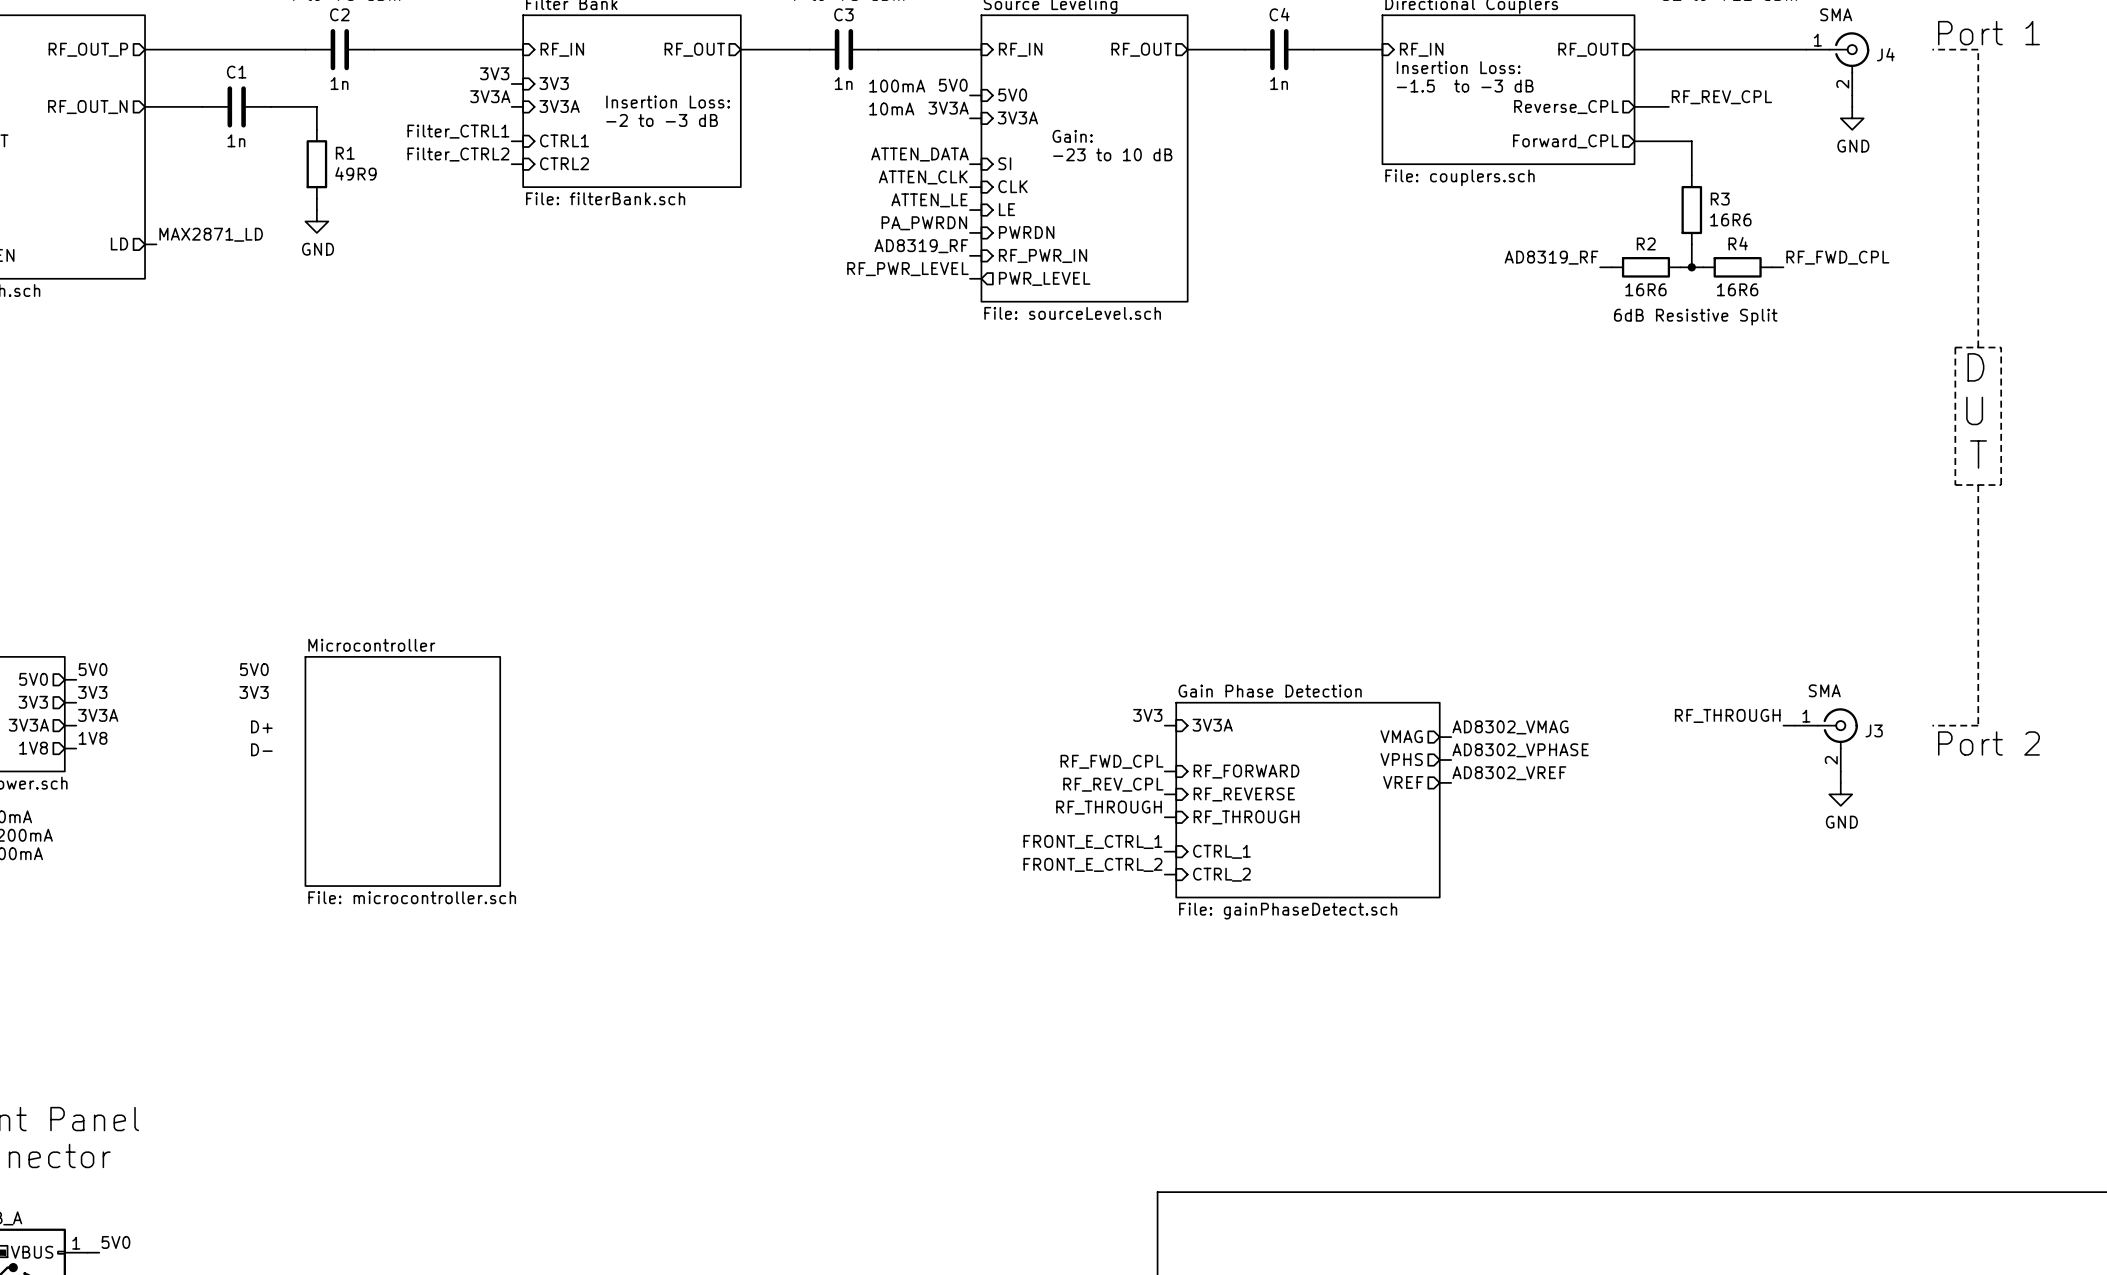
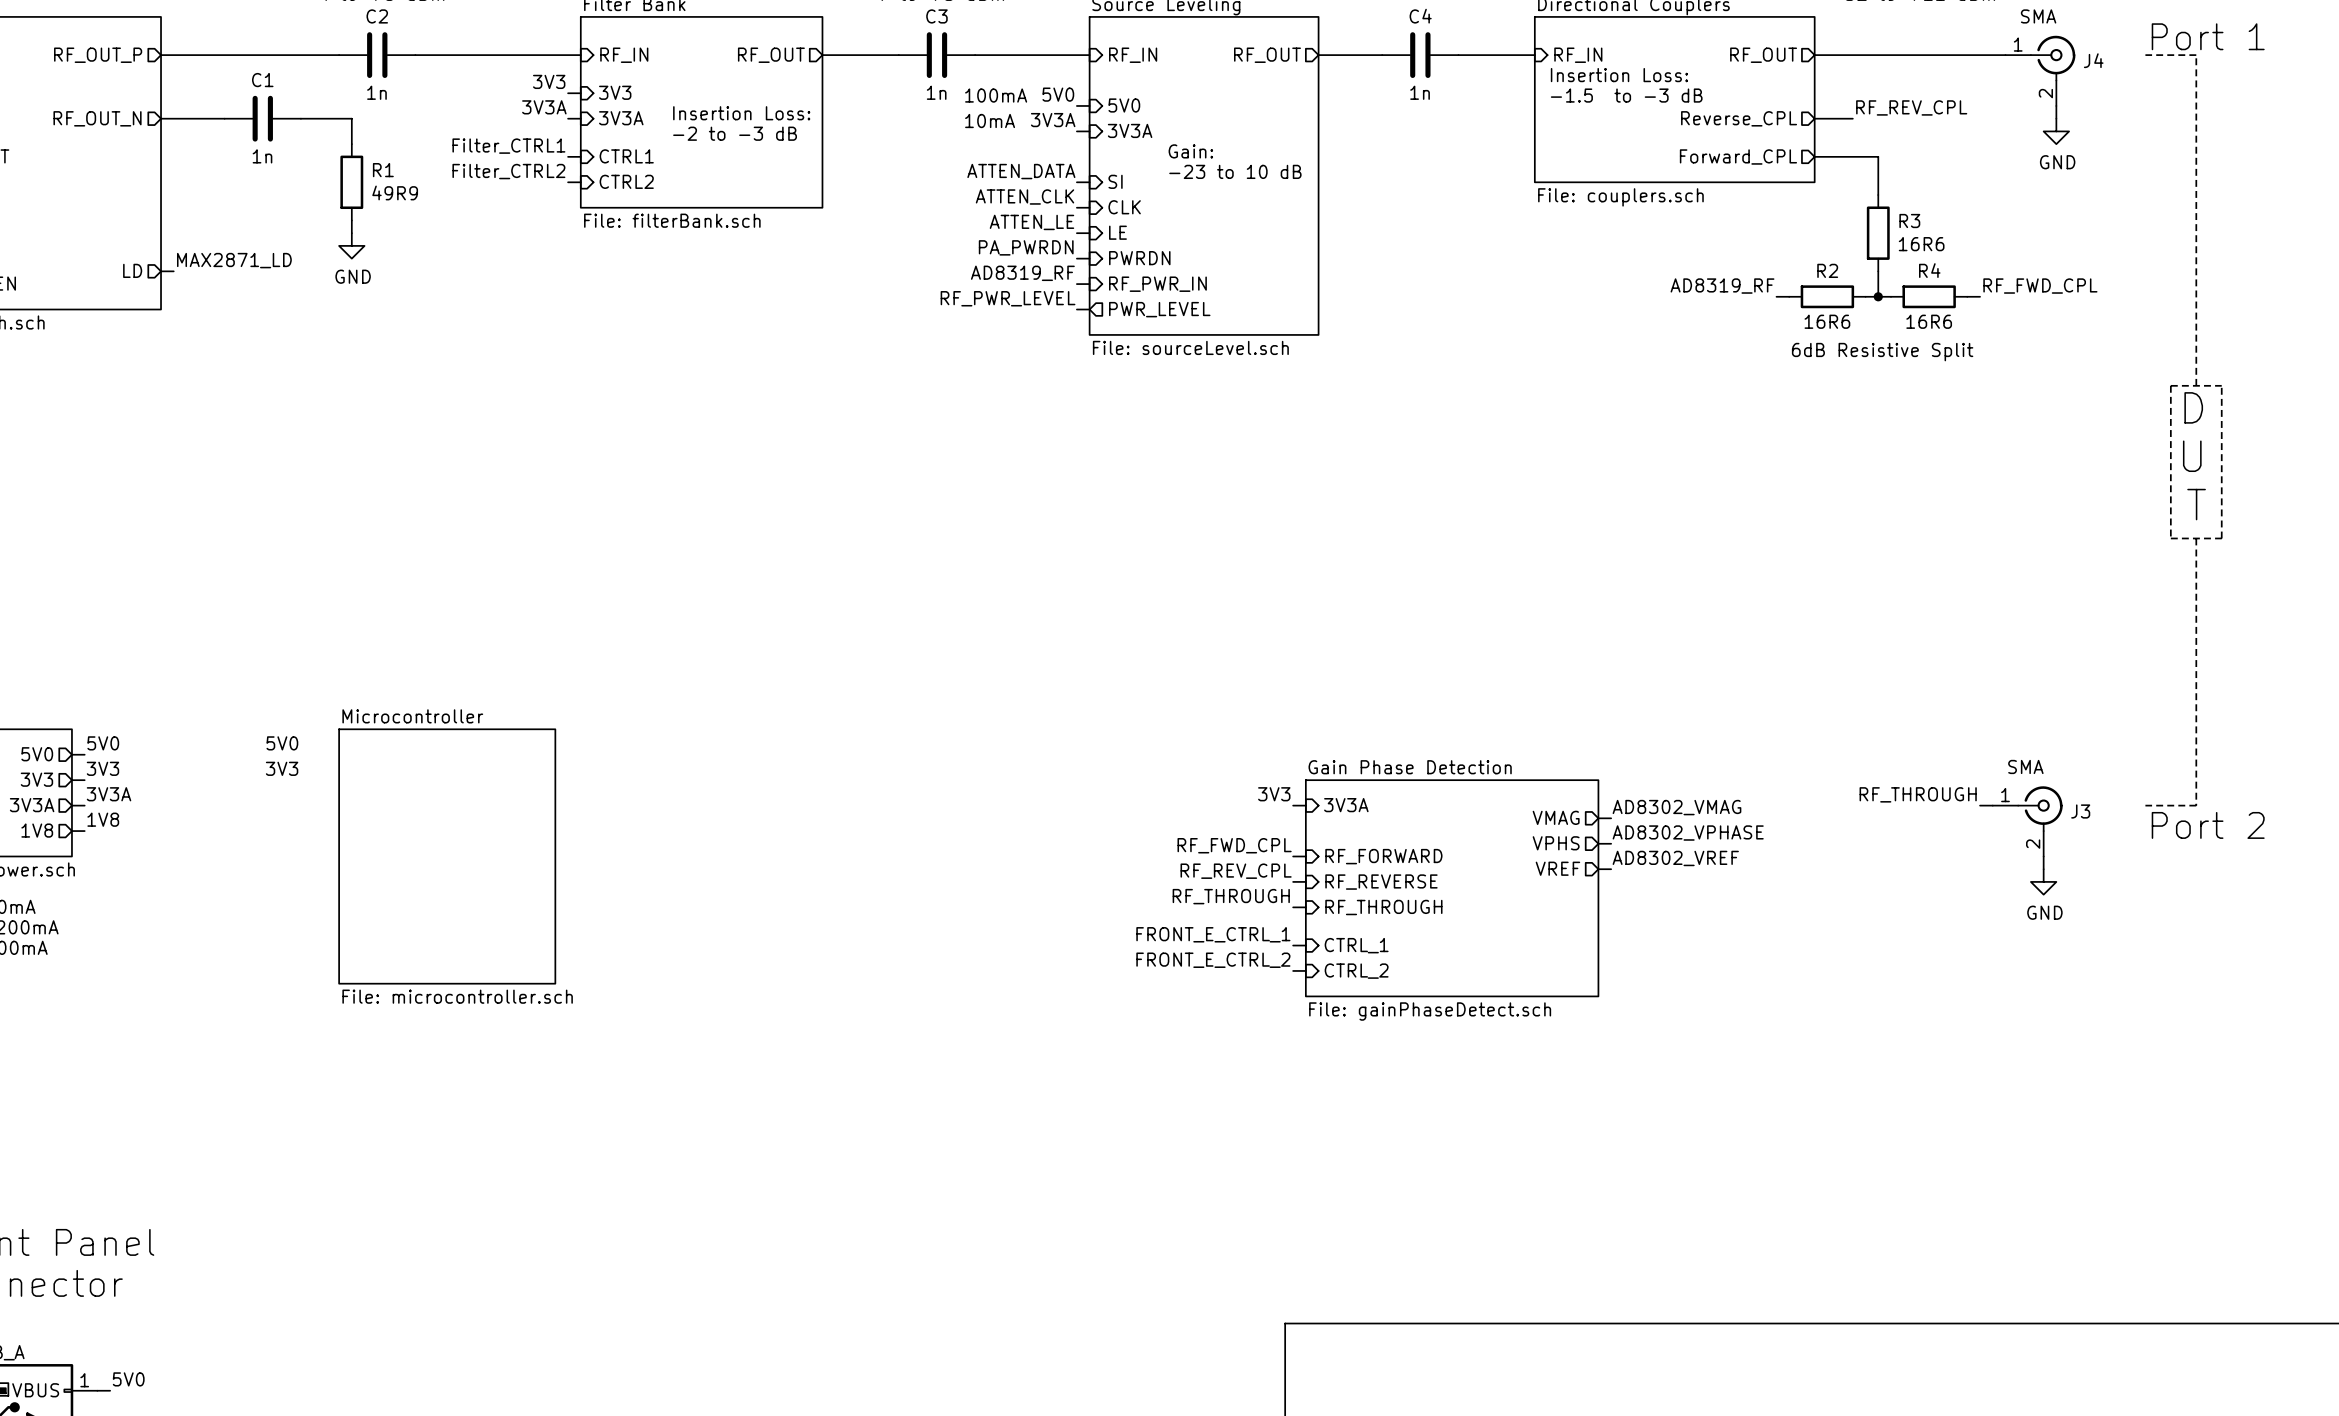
label: D+ (261, 726) -> none
label: D- (261, 749) -> none

